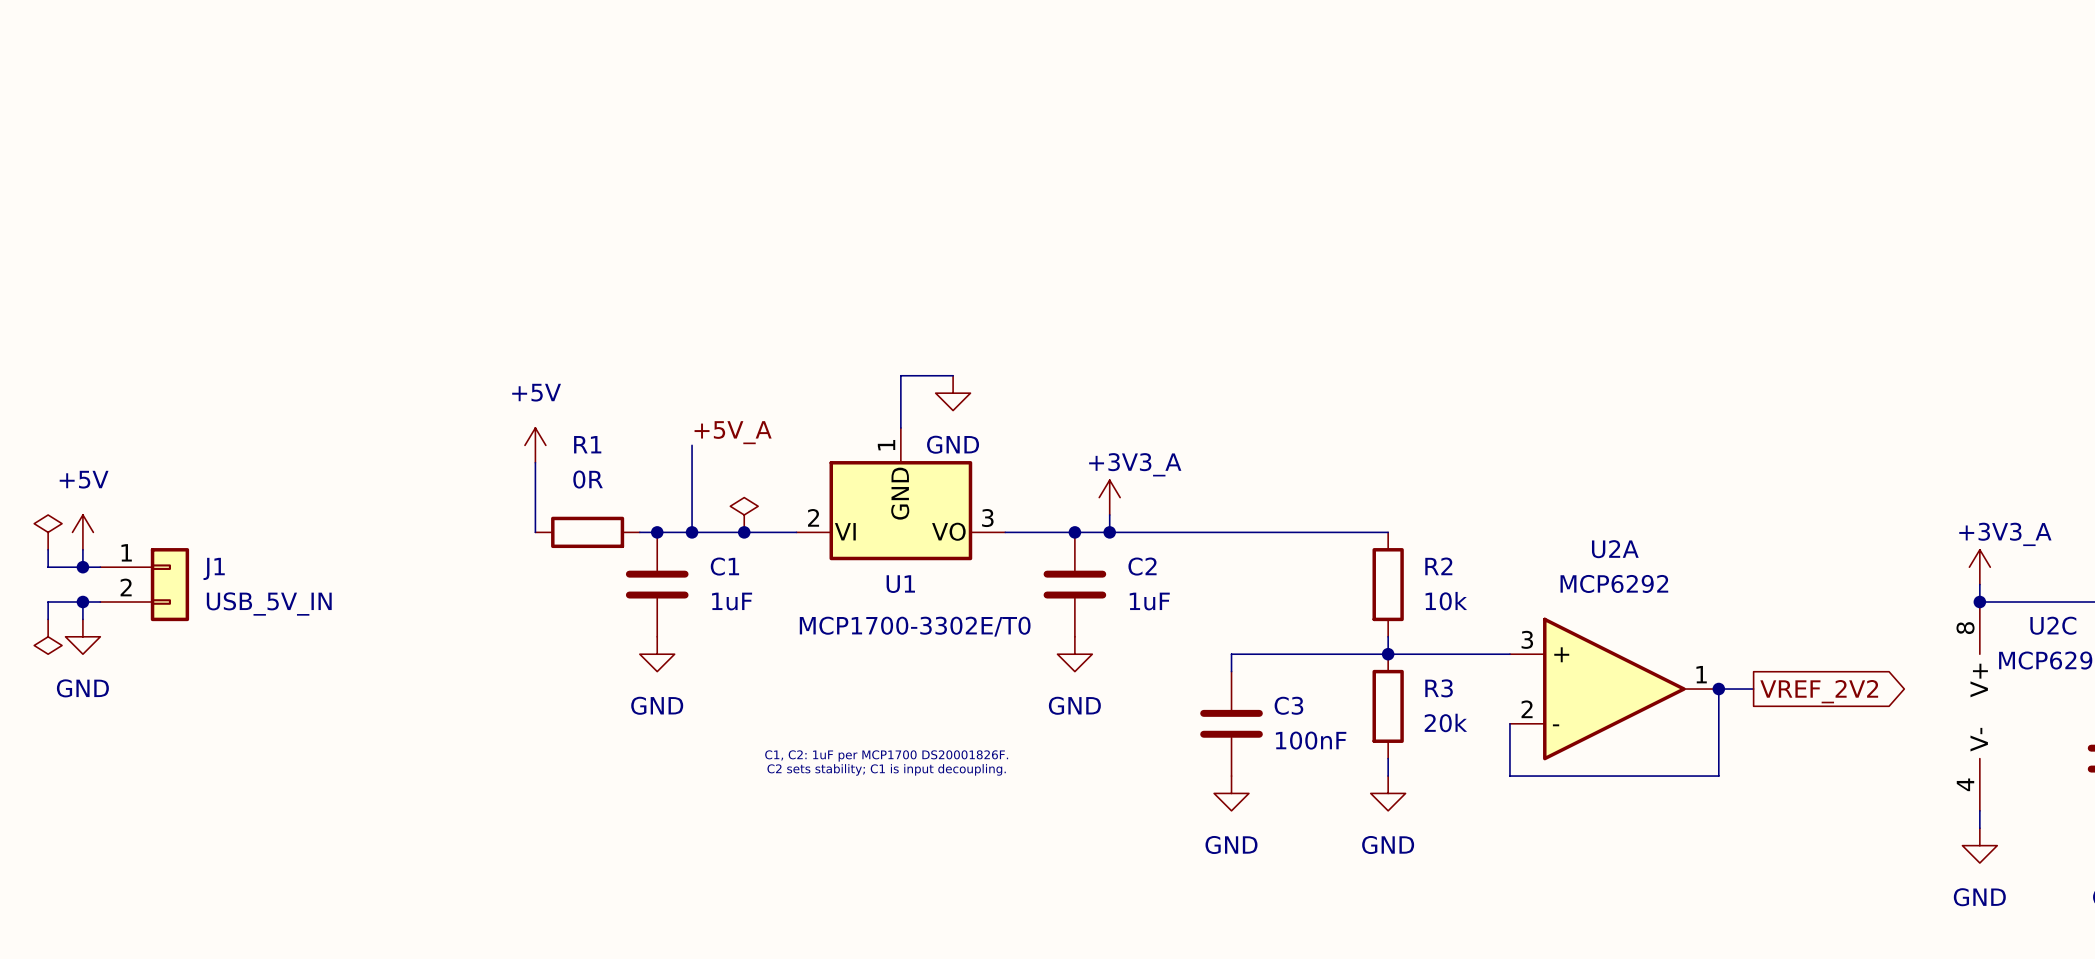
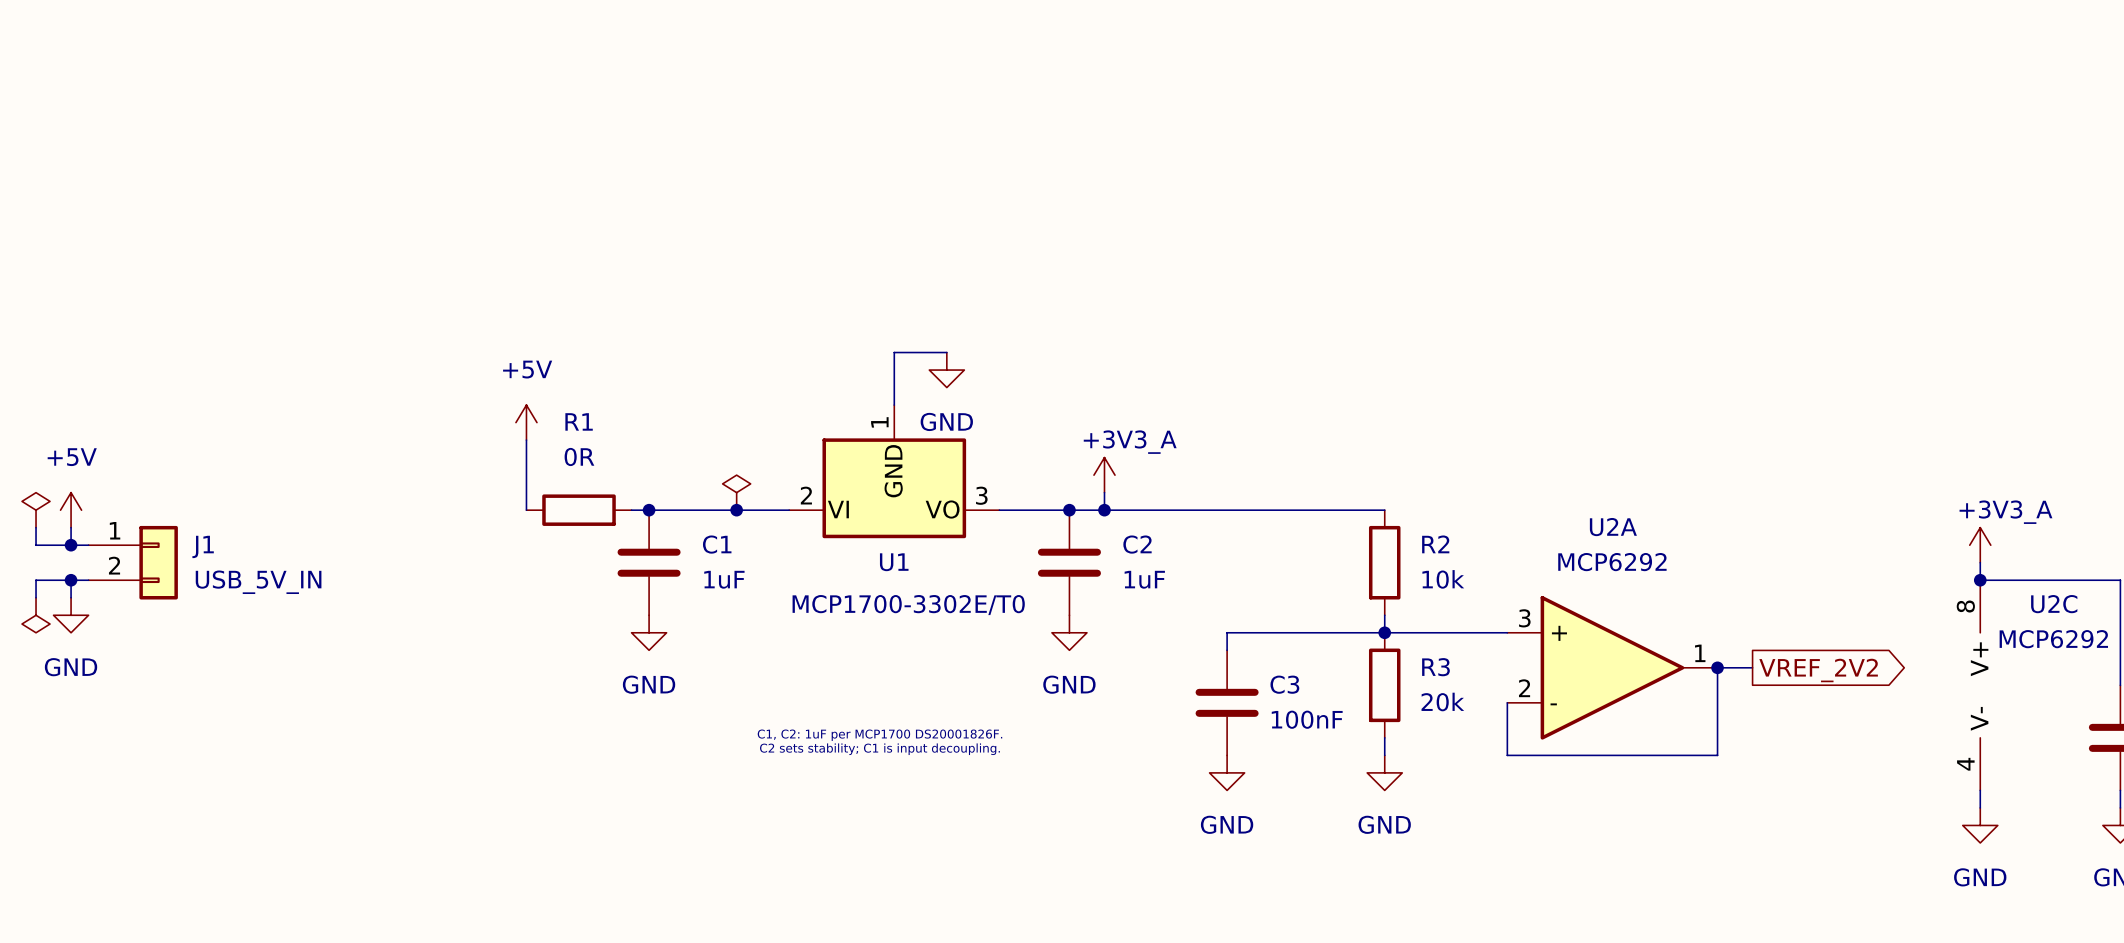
label: +5V_A (733, 432) -> none
wire: (692, 445) (692, 532) -> none
junction: (692, 532) -> none

